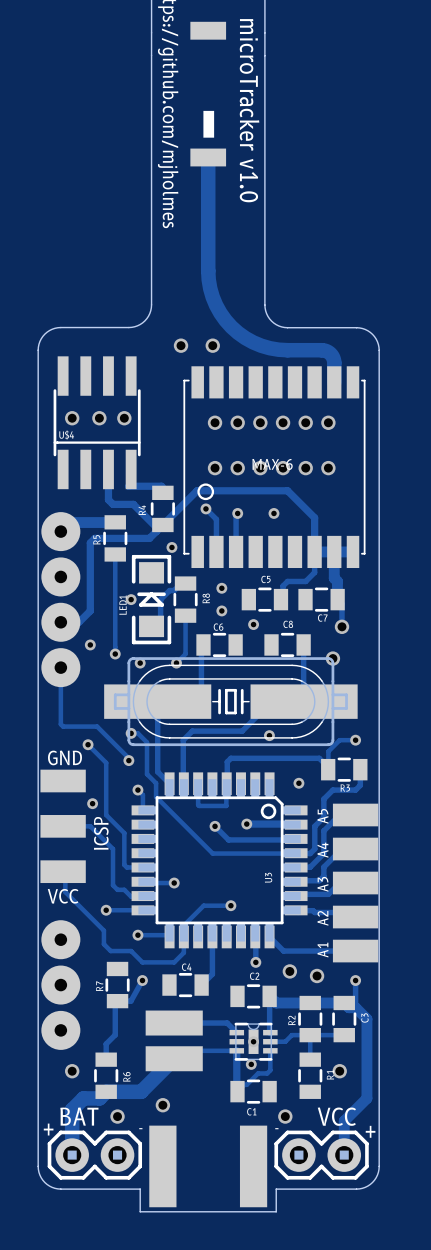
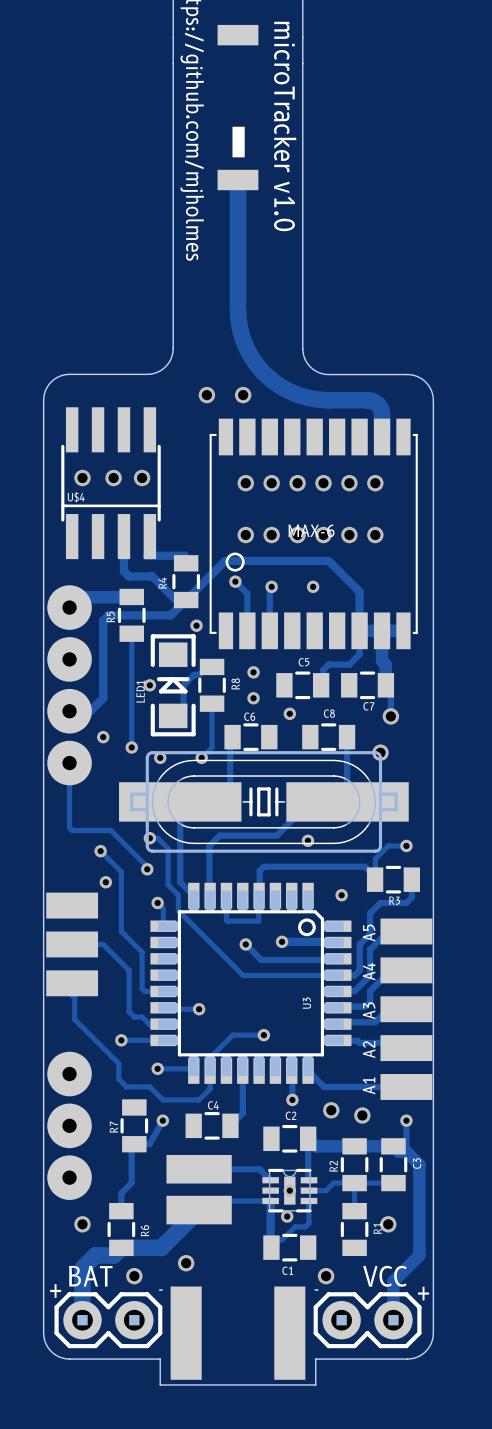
text: GND (64, 757) -> none
part footprint: [40, 769, 86, 884] -> [46, 892, 99, 997]
via position: (92, 803) -> (105, 882)
text: ICSP (101, 833) -> none
text: VCC (63, 896) -> none

